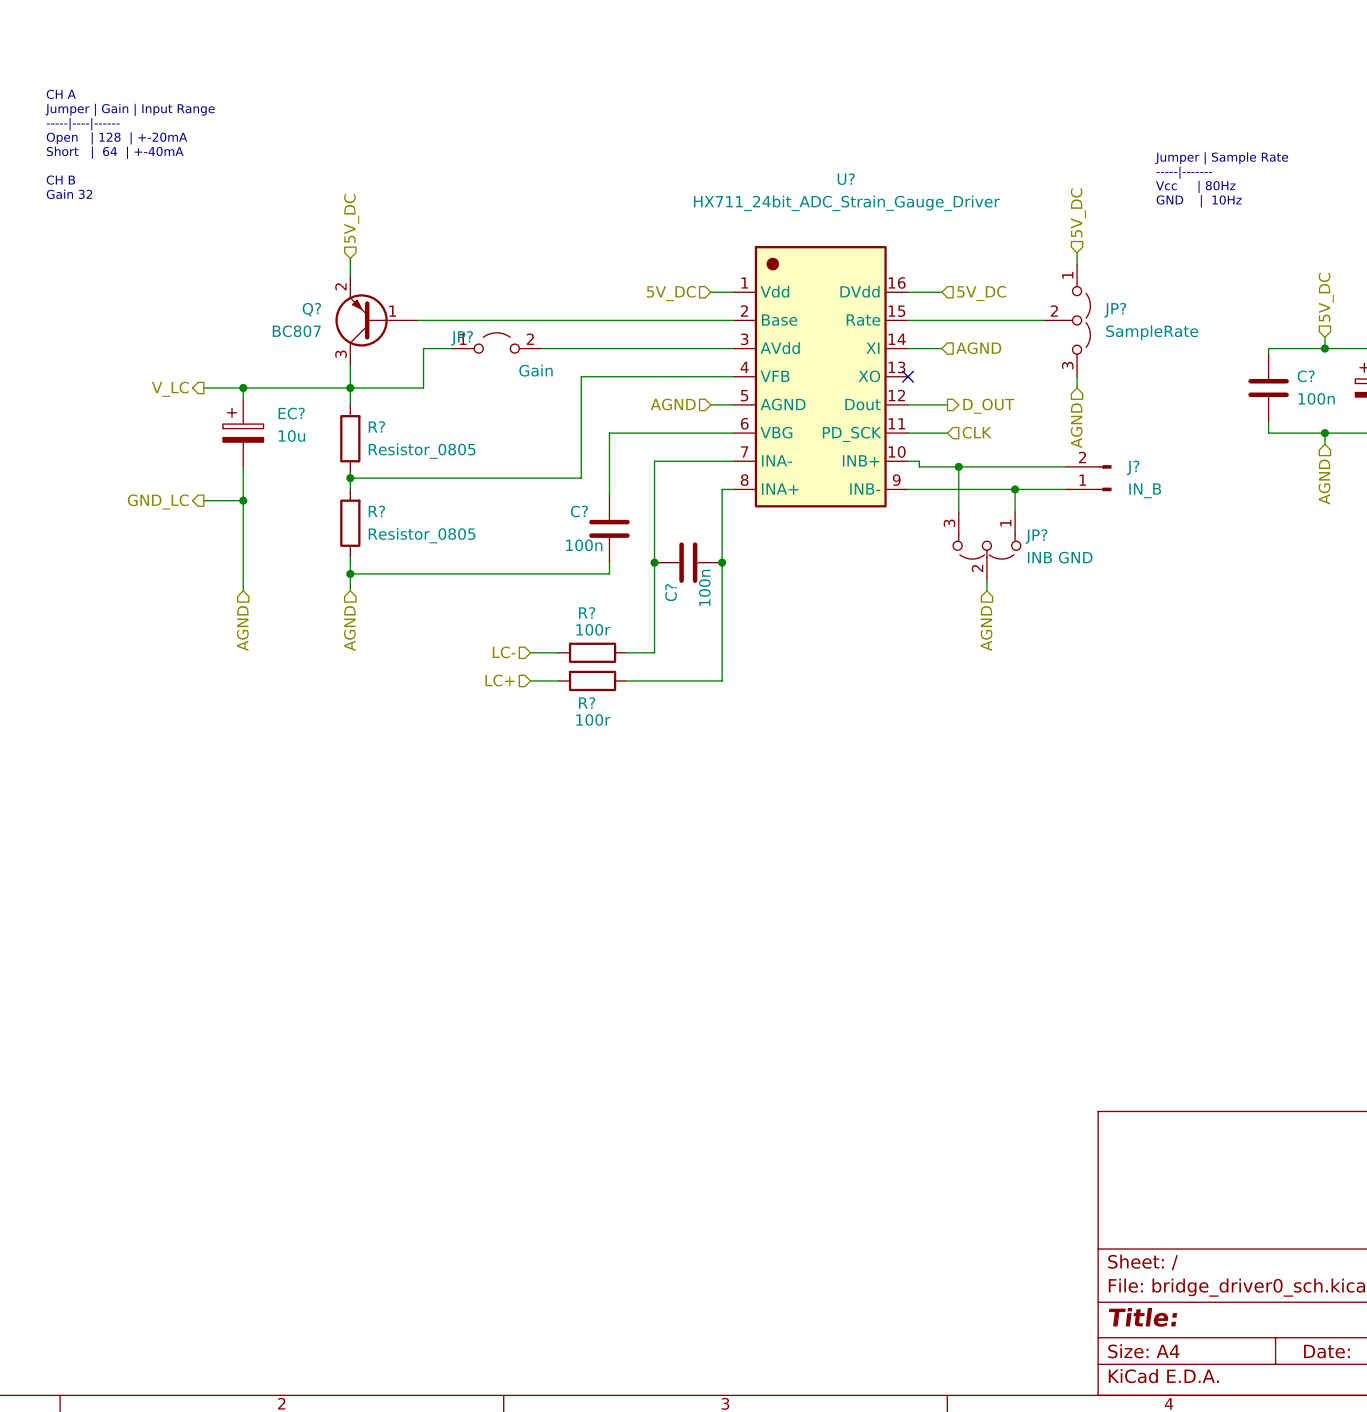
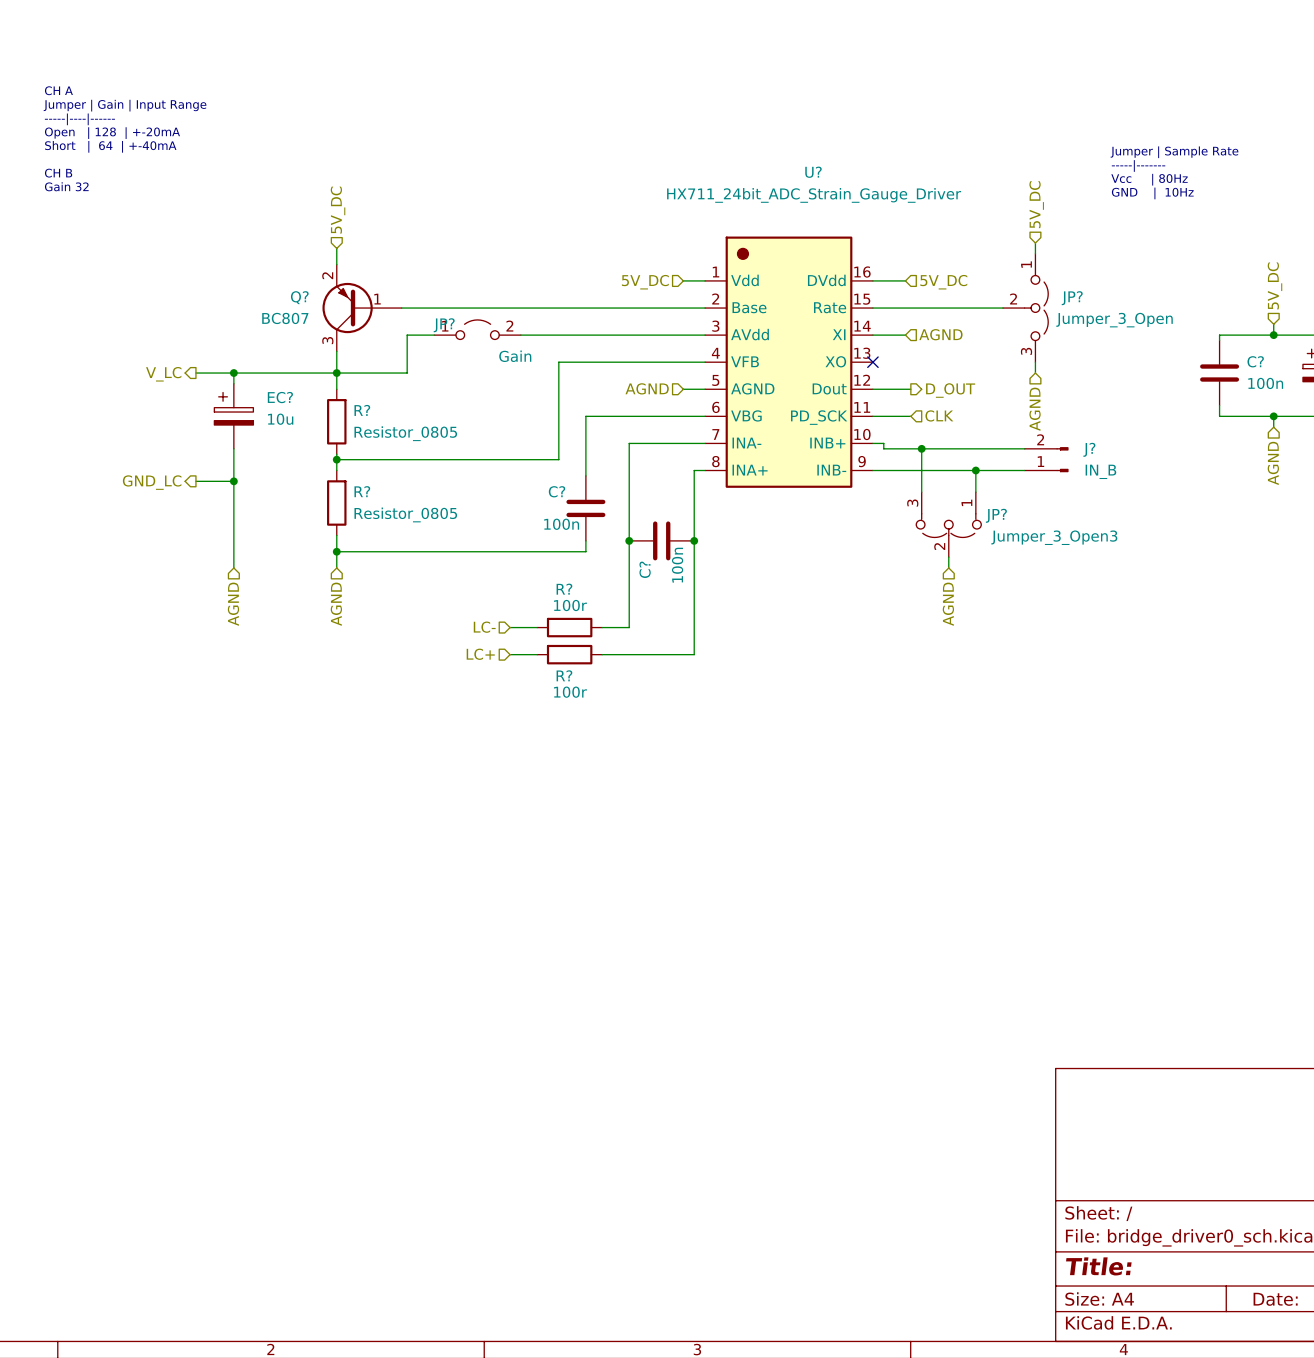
JP? value: SampleRate (1152, 332) -> Jumper_3_Open (1114, 320)
JP? value: INB GND (1060, 557) -> Jumper_3_Open3 (1054, 537)

